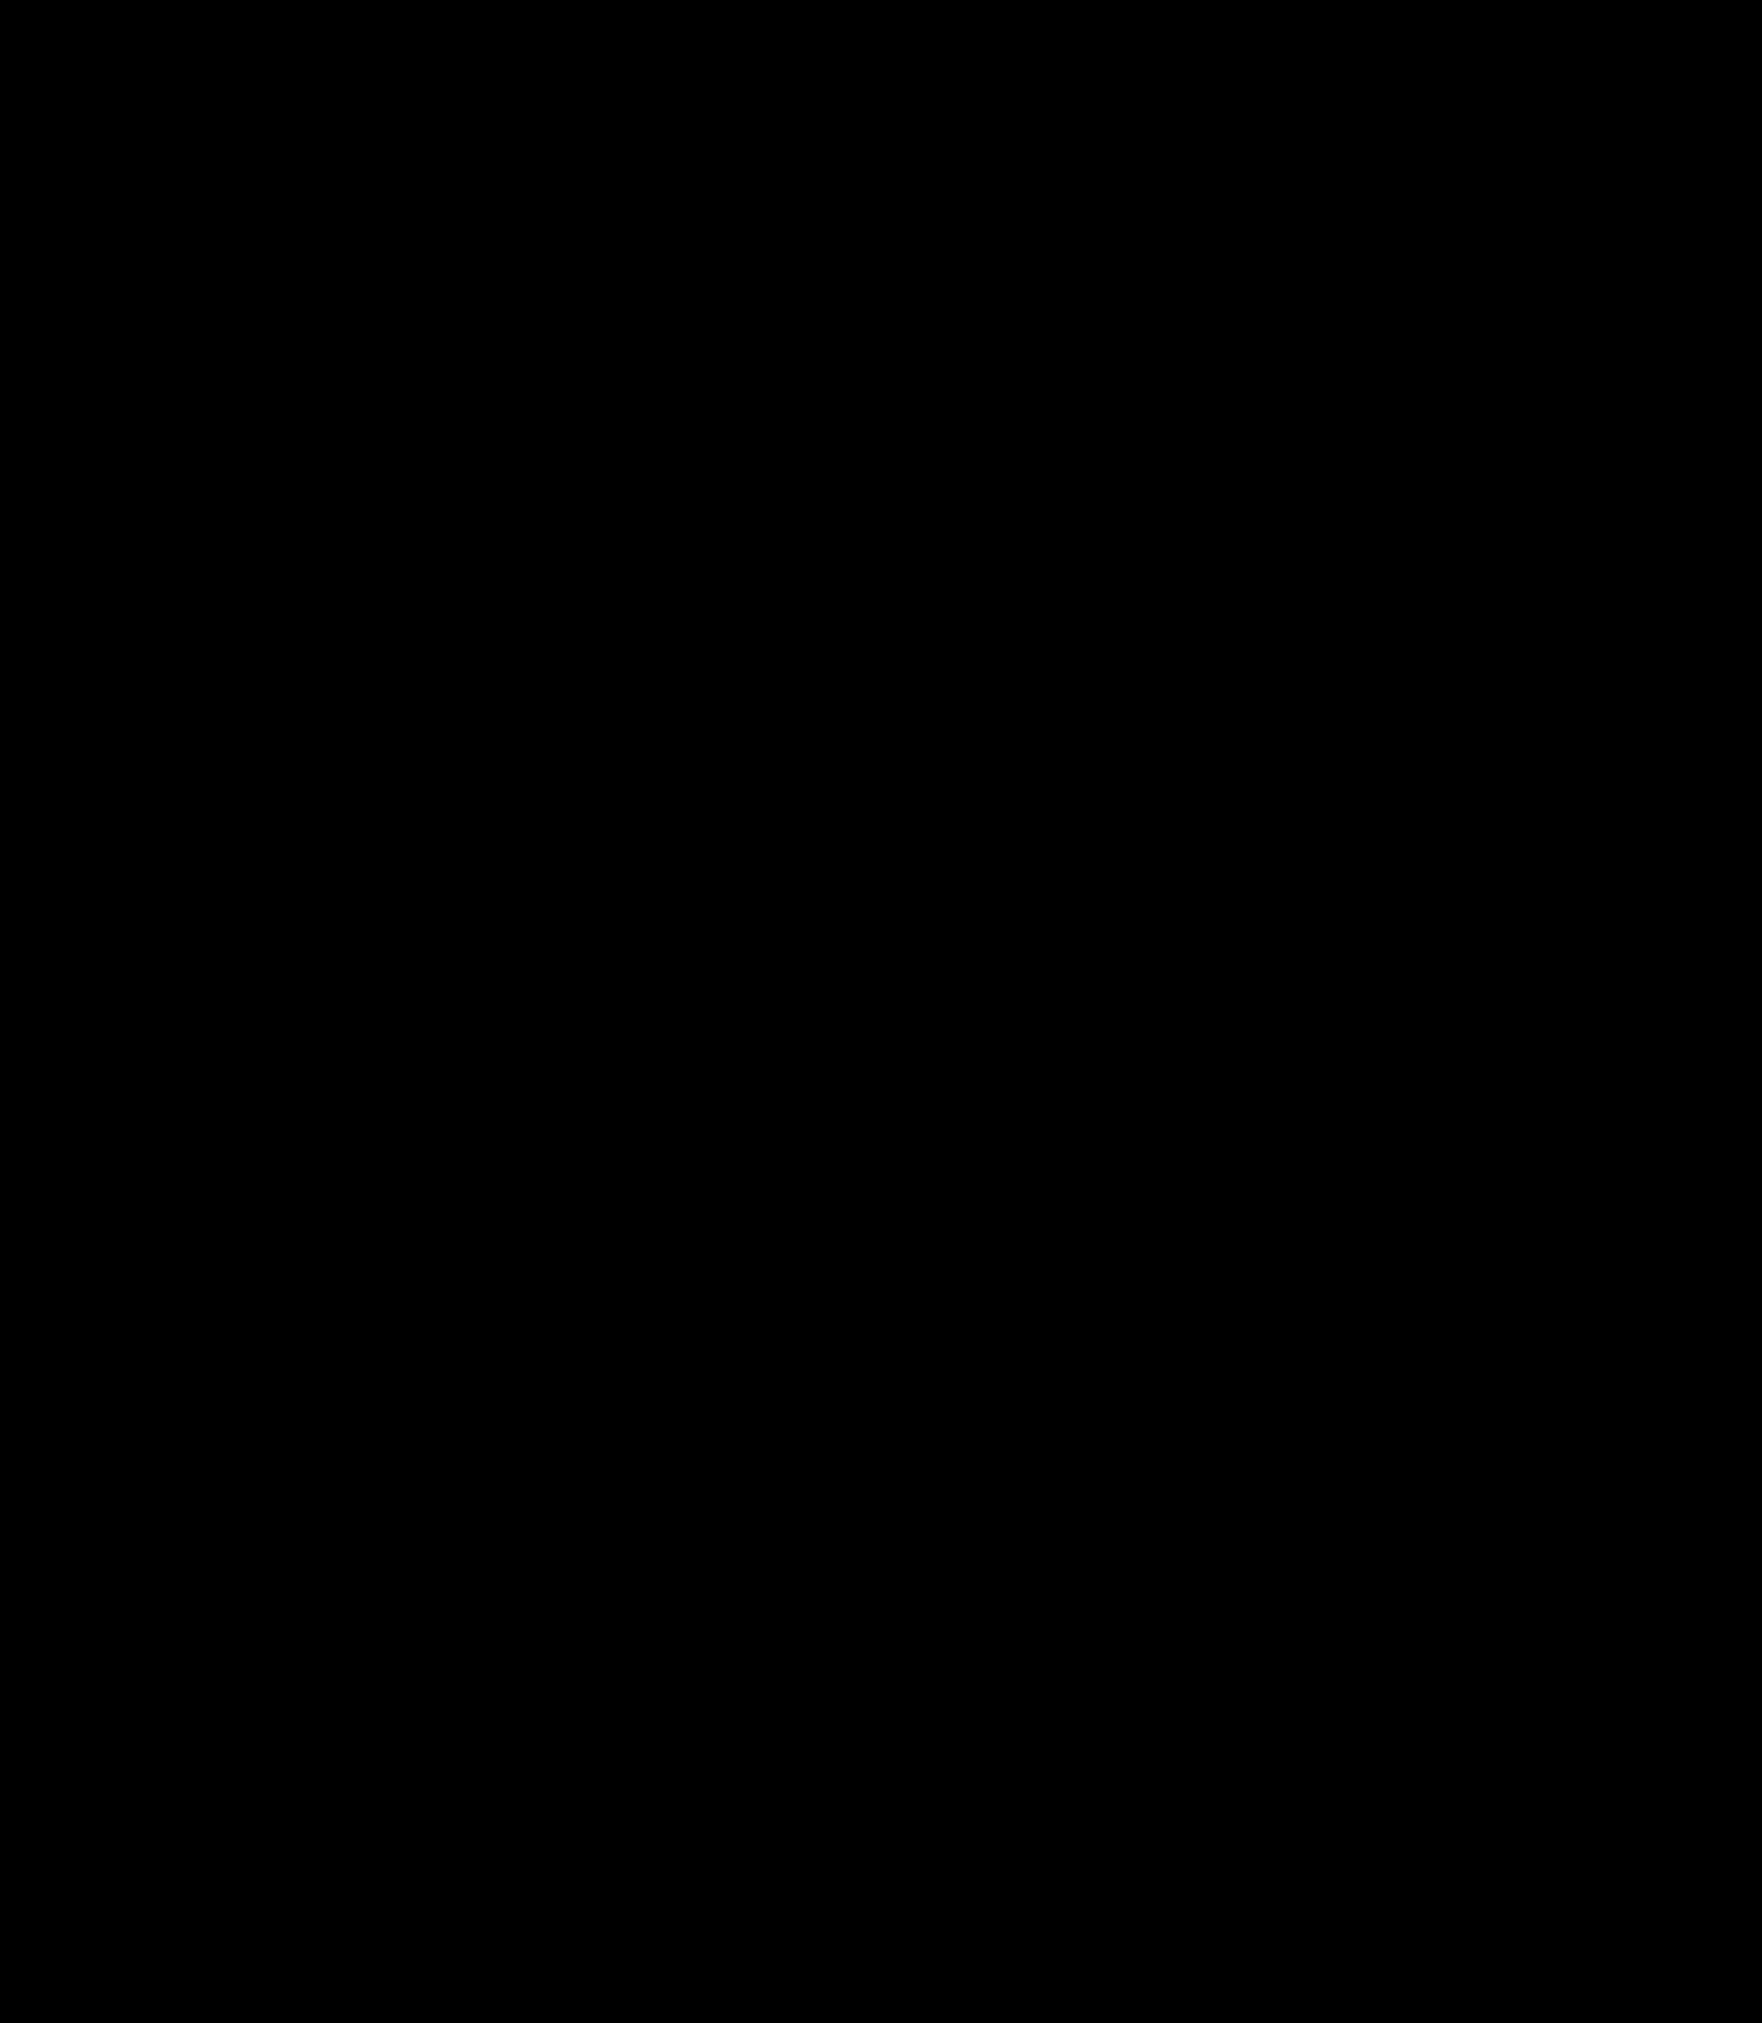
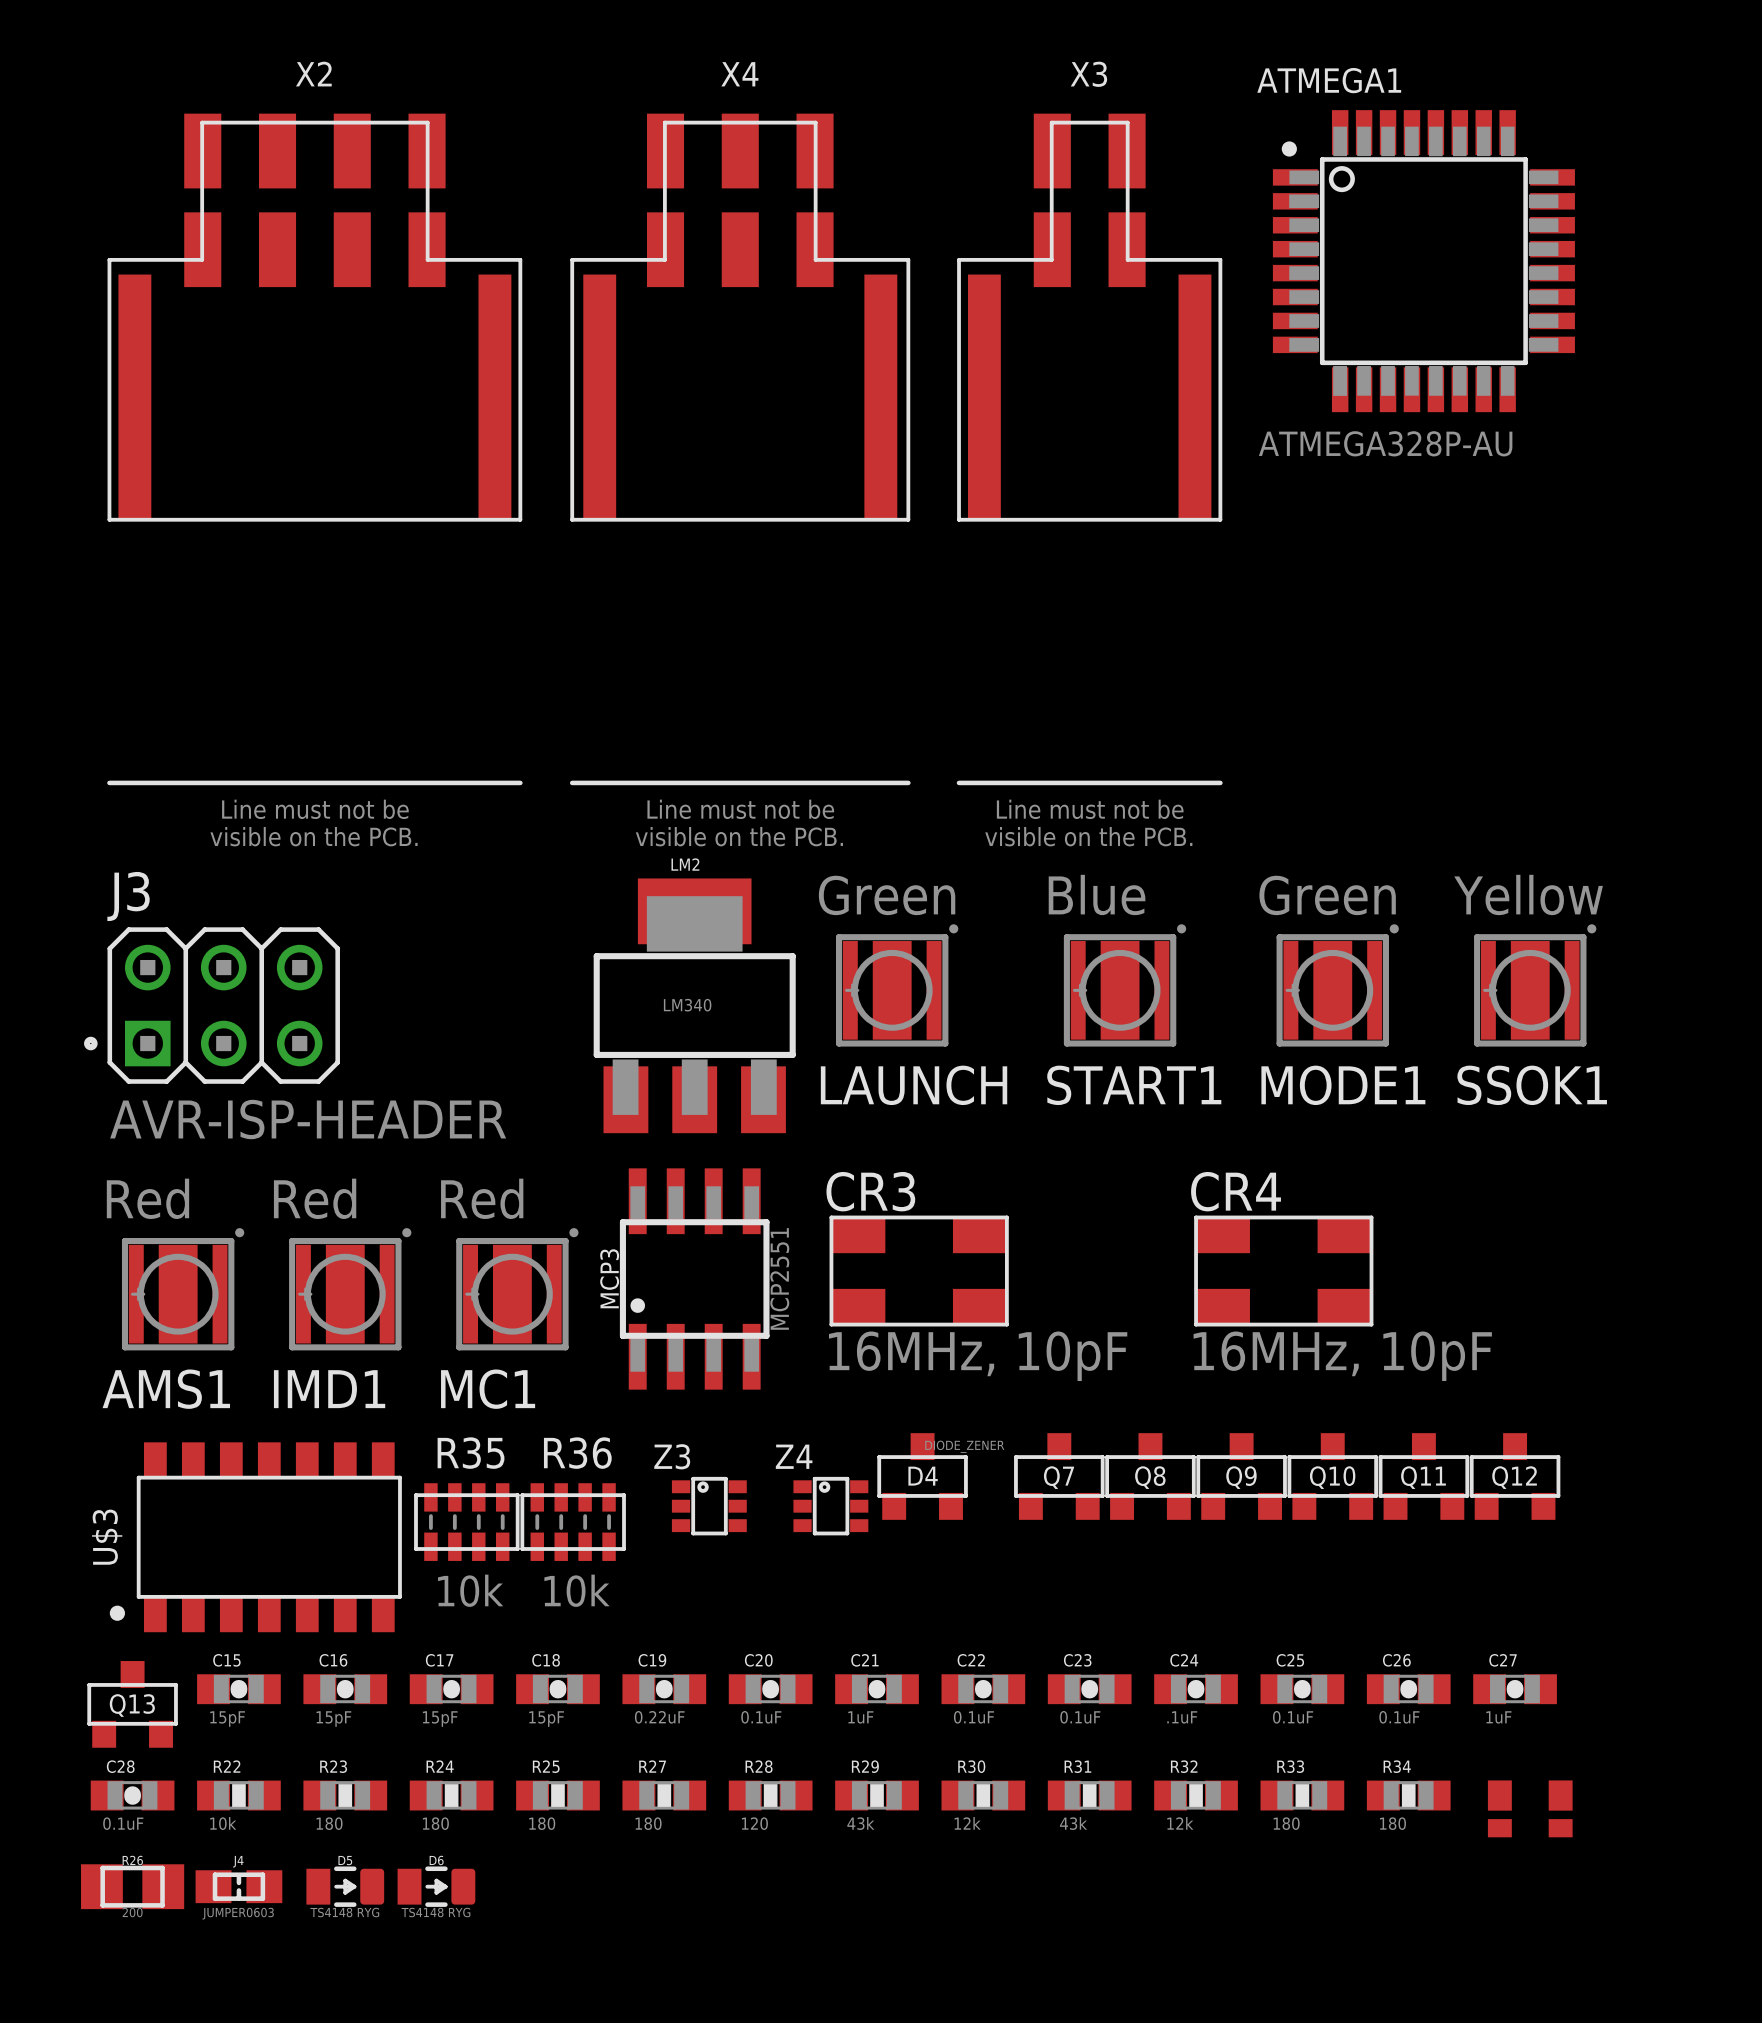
ATMEGA1: none -> ATMEGA328P-AU (1423, 261)
X2: none -> (314, 449)
X4: none -> (740, 449)
X3: none -> (1089, 449)
LAUNCH: none -> Green (897, 985)
START1: none -> Blue (1125, 985)
MODE1: none -> Green (1337, 985)
SSOK1: none -> Yellow (1535, 985)
J3: none -> AVR-ISP-HEADER (212, 1005)
LM2: none -> LM340 (694, 1005)
CR3: none -> 16MHz, 10pF (919, 1271)
CR4: none -> 16MHz, 10pF (1283, 1271)
MCP3: none -> MCP2551 (694, 1279)
AMS1: none -> Red (183, 1289)
IMD1: none -> Red (350, 1289)
MC1: none -> Red (517, 1289)
D4: none -> DIODE_ZENER (922, 1476)
Q7: none -> (1059, 1476)
Q8: none -> (1150, 1476)
Q9: none -> (1241, 1476)
Q10: none -> (1332, 1476)
Q11: none -> (1423, 1476)
Q12: none -> (1515, 1476)
Z3: none -> (709, 1506)
Z4: none -> (830, 1506)
R35: none -> 10k (466, 1522)
R36: none -> 10k (573, 1522)
U$3: none -> (255, 1537)
C15: none -> 15pF (238, 1689)
C16: none -> 15pF (345, 1689)
C17: none -> 15pF (451, 1689)
C18: none -> 15pF (557, 1689)
C19: none -> 0.22uF (664, 1689)
C20: none -> 0.1uF (770, 1689)
C21: none -> 1uF (877, 1689)
C22: none -> 0.1uF (983, 1689)
C23: none -> 0.1uF (1089, 1689)
C24: none -> .1uF (1196, 1689)
C25: none -> 0.1uF (1302, 1689)
C26: none -> 0.1uF (1408, 1689)
C27: none -> 1uF (1515, 1689)
Q13: none -> (132, 1704)
C28: none -> 0.1uF (132, 1795)
R22: none -> 10k (238, 1795)
R23: none -> 180 (345, 1795)
R24: none -> 180 (451, 1795)
R25: none -> 180 (557, 1795)
R27: none -> 180 (664, 1795)
R28: none -> 120 (770, 1795)
R29: none -> 43k (877, 1795)
R30: none -> 12k (983, 1795)
R31: none -> 43k (1089, 1795)
R32: none -> 12k (1196, 1795)
R33: none -> 180 (1302, 1795)
R34: none -> 180 (1408, 1795)
part: none -> (1499, 1808)
part: none -> (1560, 1808)
R26: none -> 200 (132, 1886)
J4: none -> JUMPER0603 (238, 1886)
D5: none -> TS4148 RYG (345, 1886)
D6: none -> TS4148 RYG (436, 1886)

